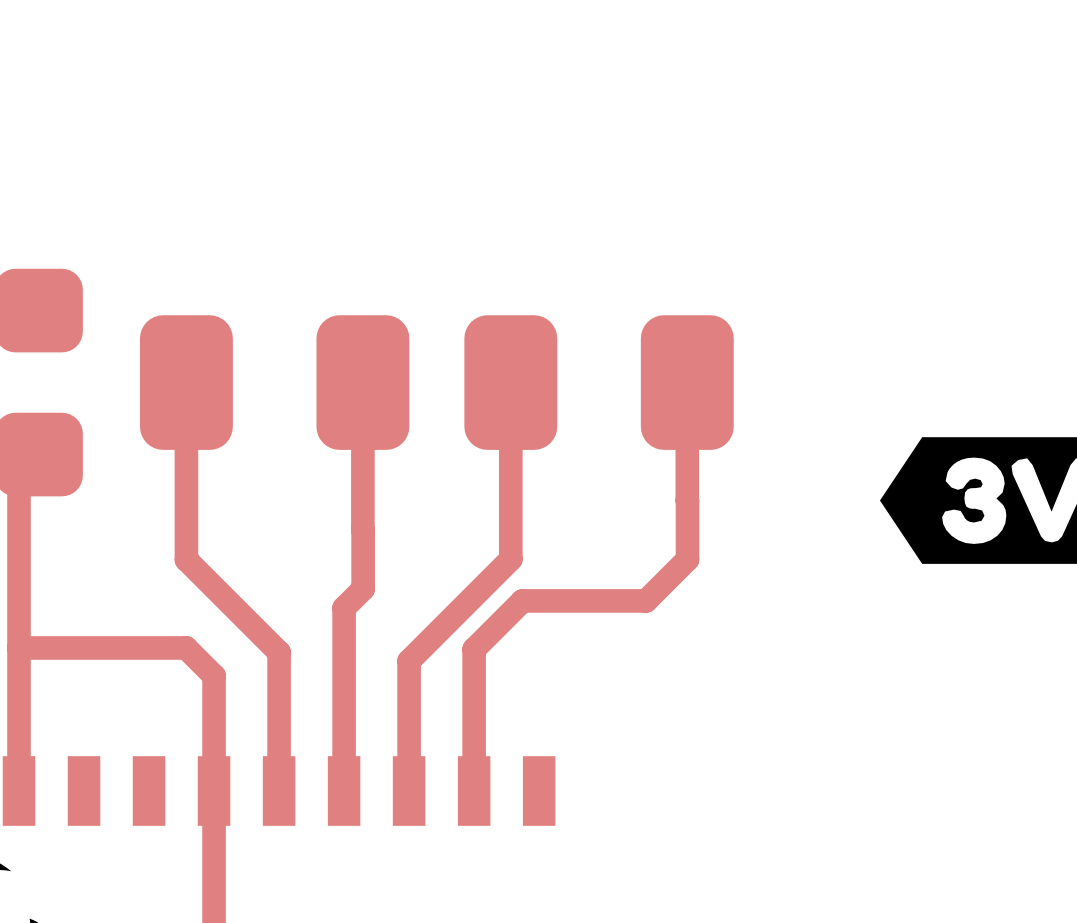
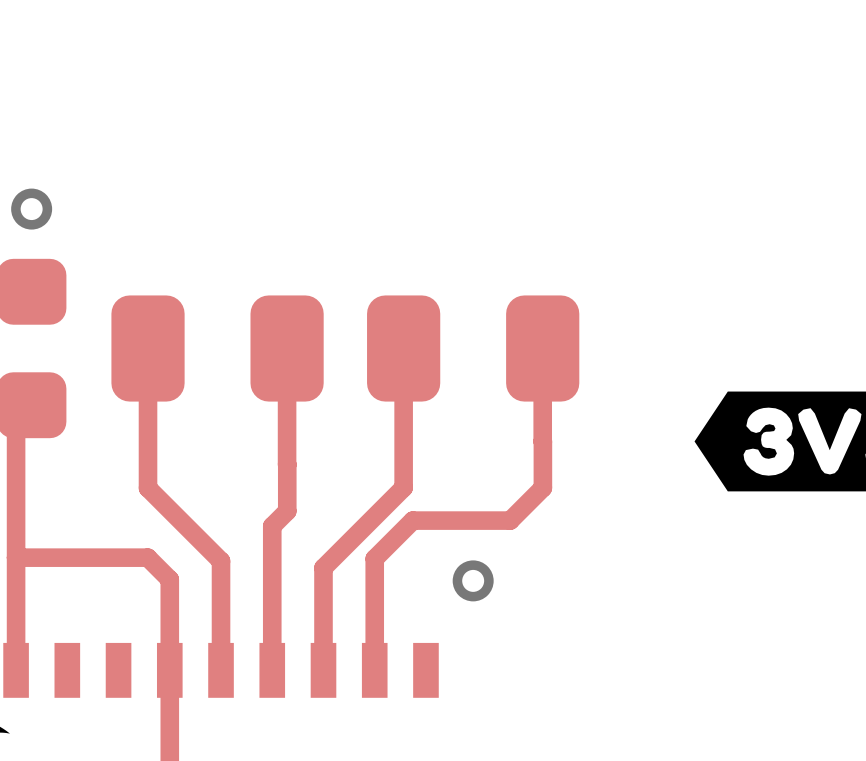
via: none -> (31, 209)
via: none -> (473, 580)

